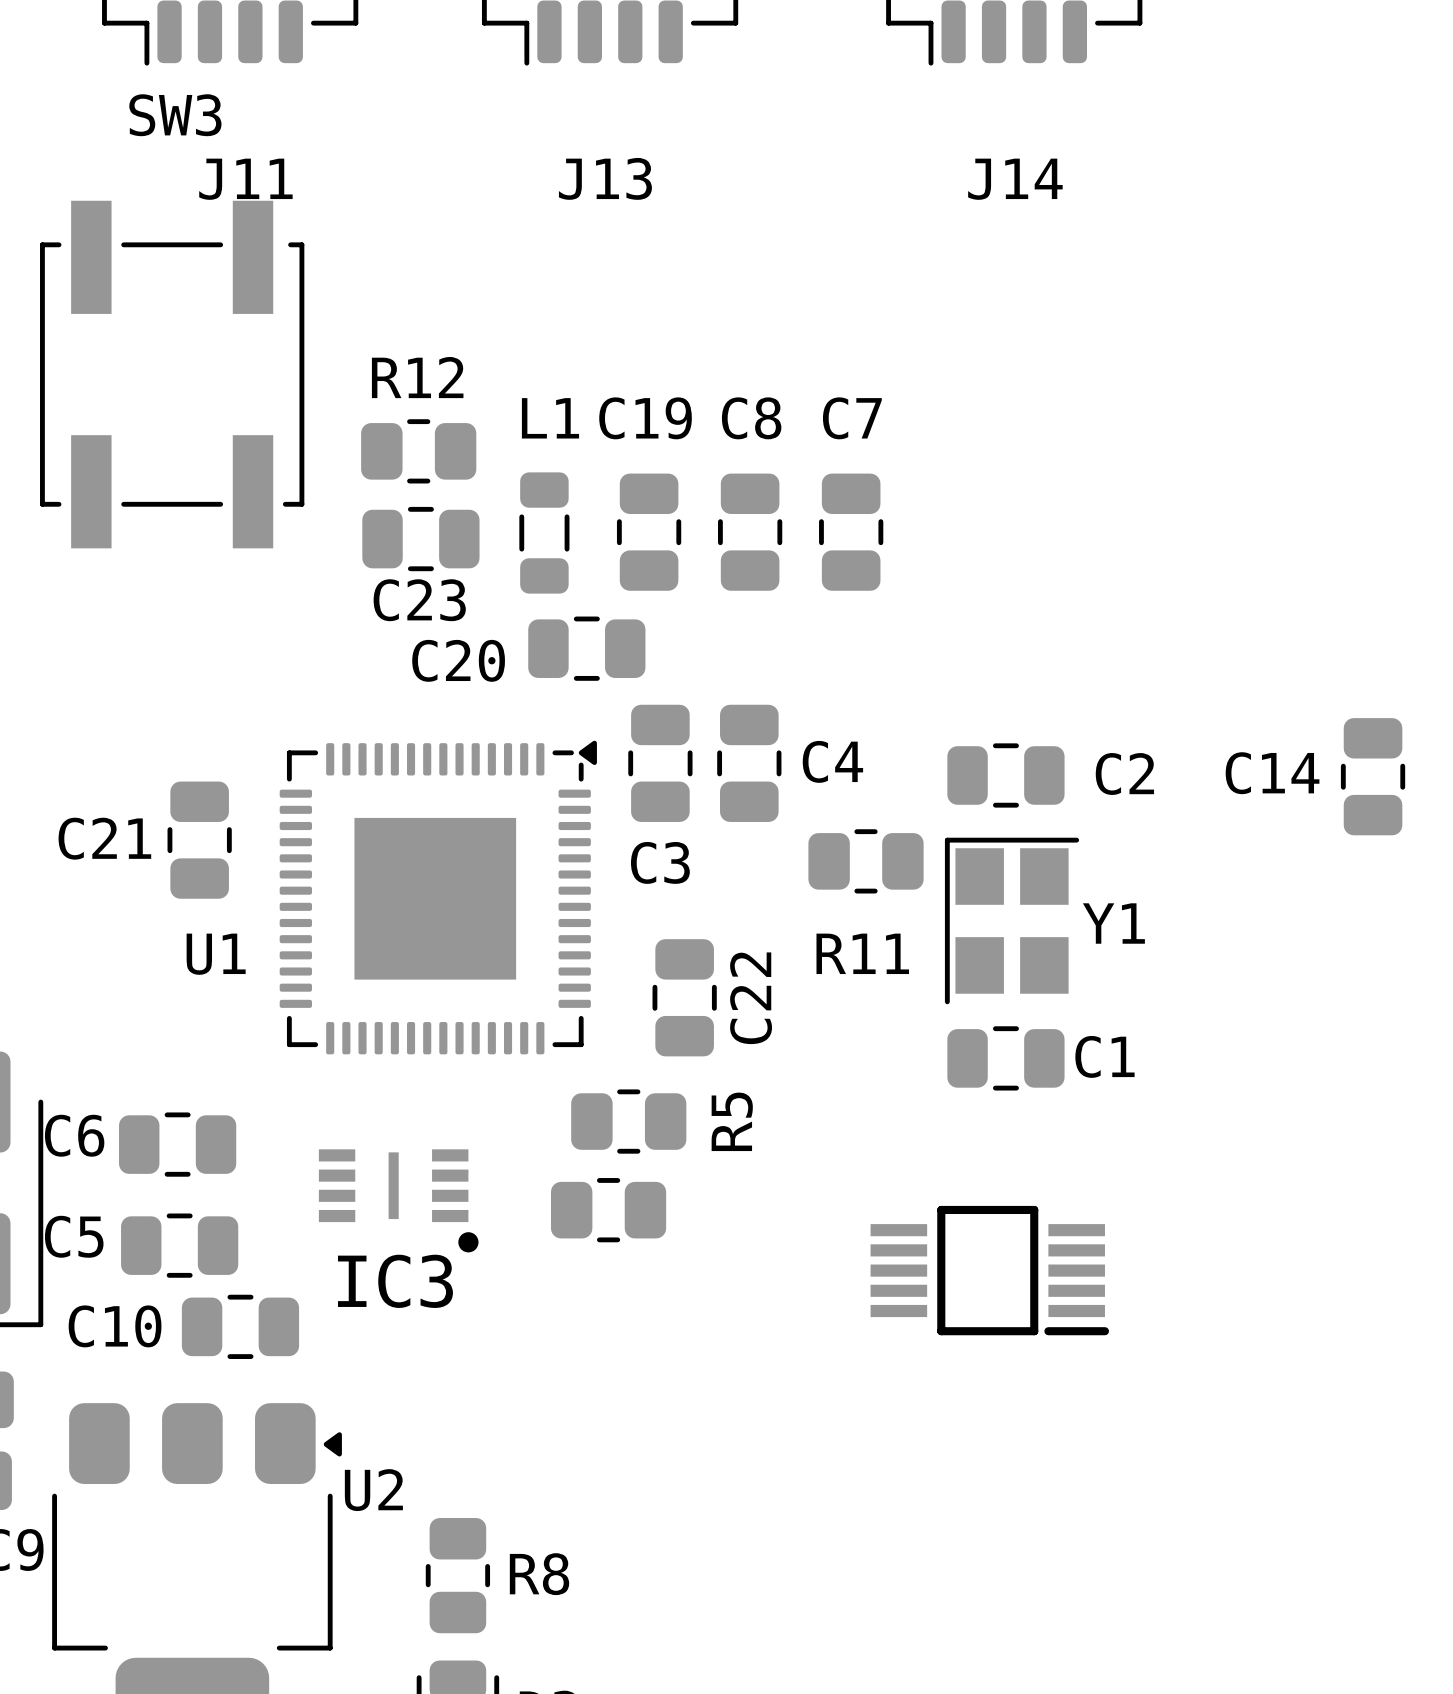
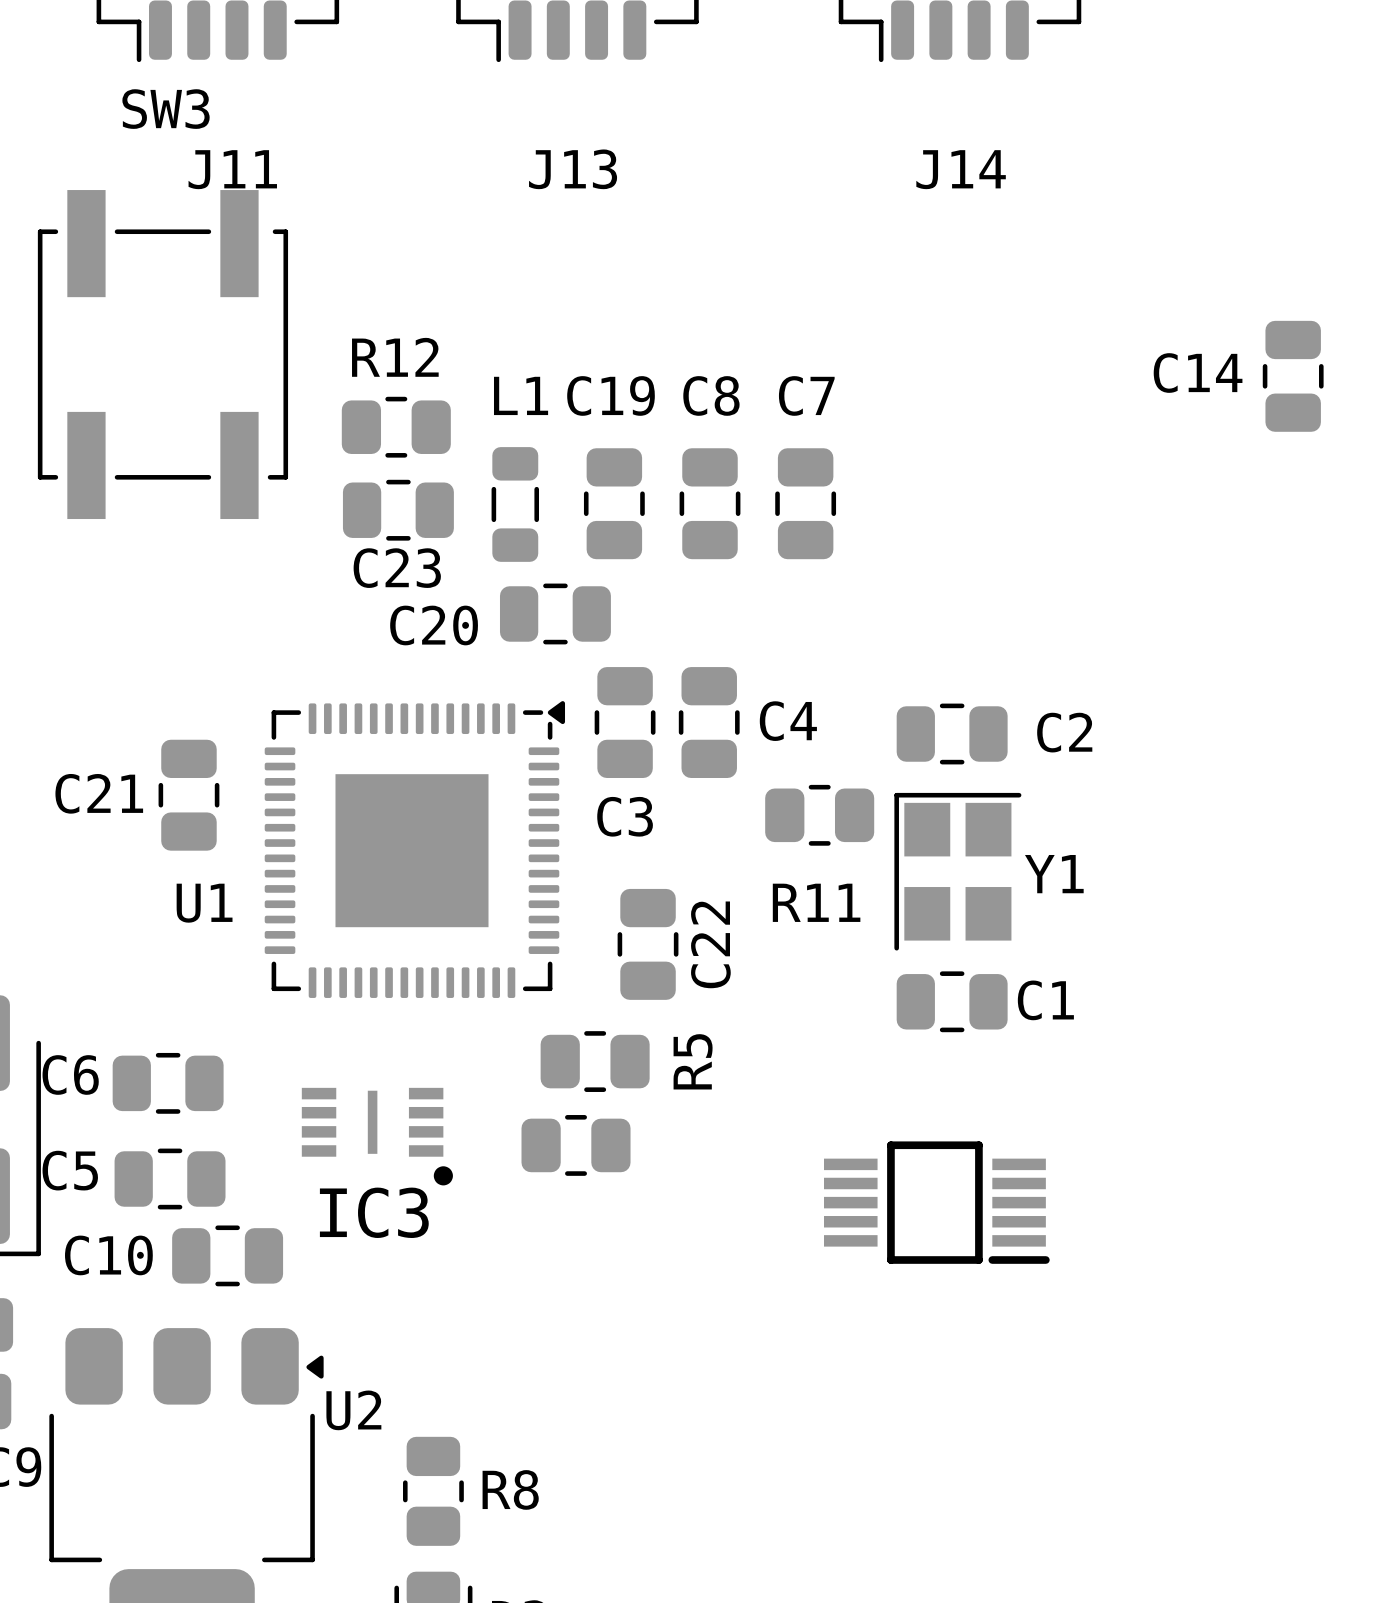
C14 position: (1373, 776) -> (1293, 376)

